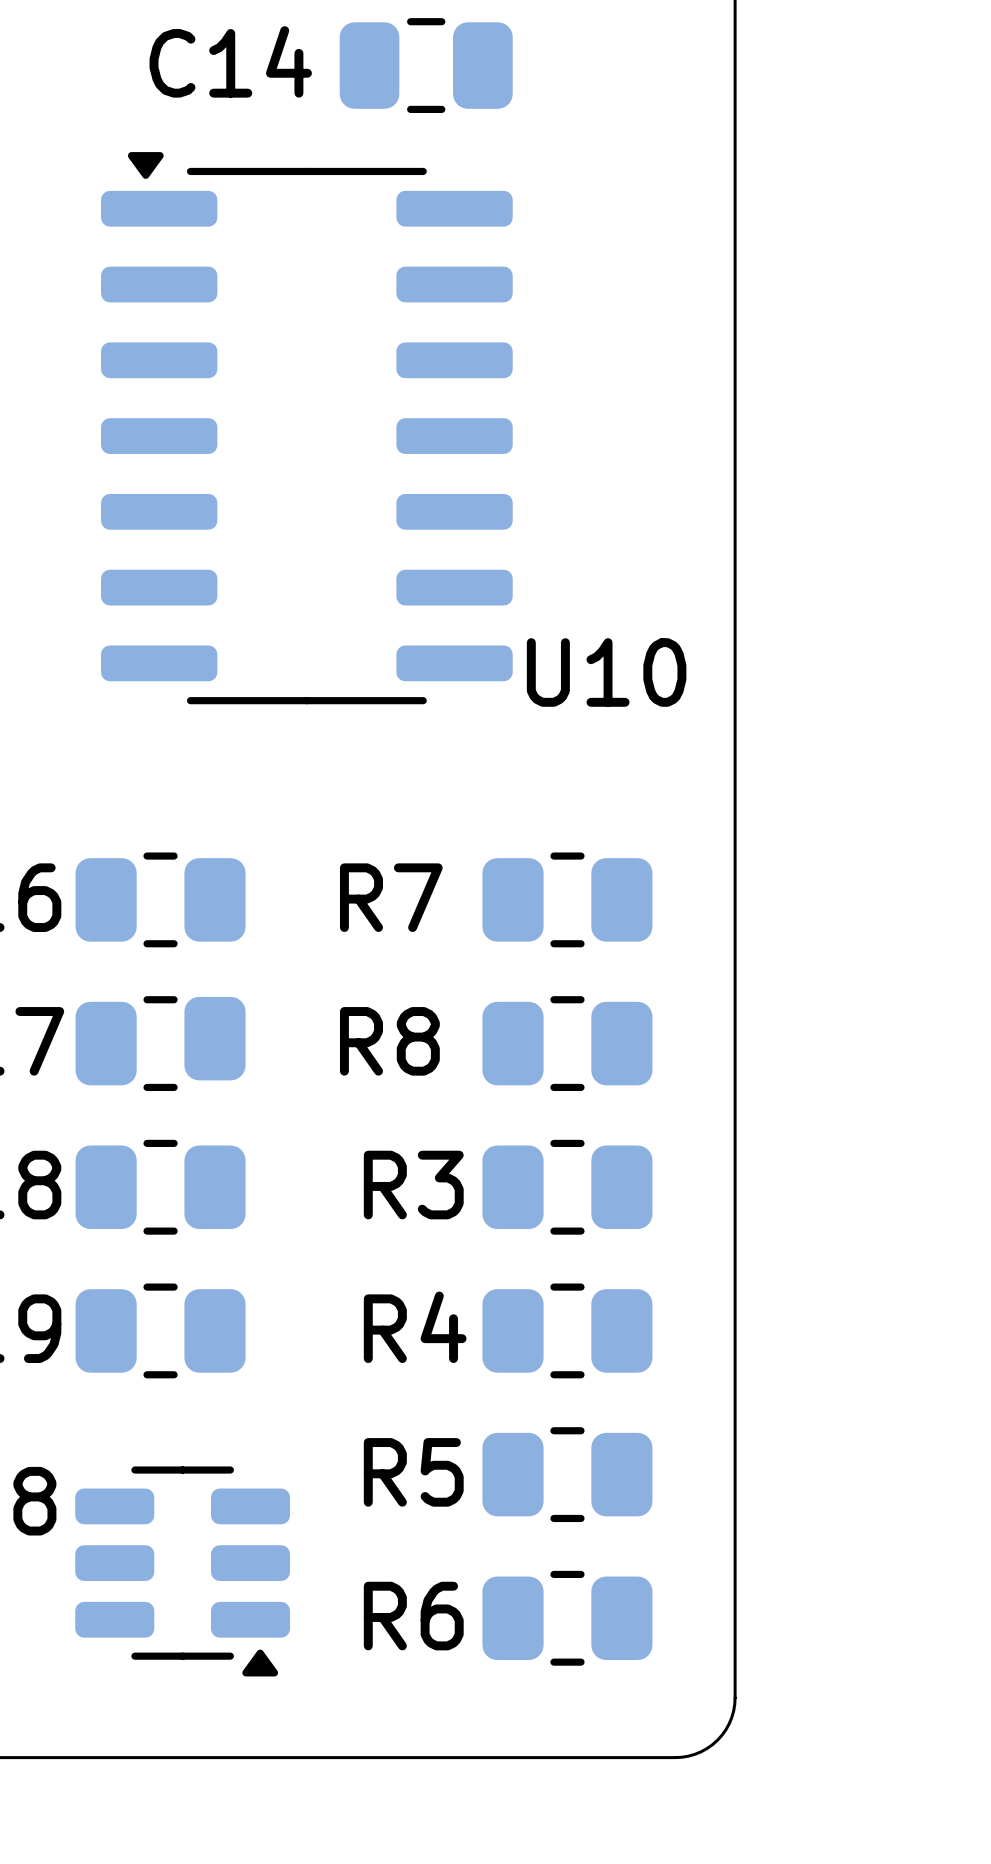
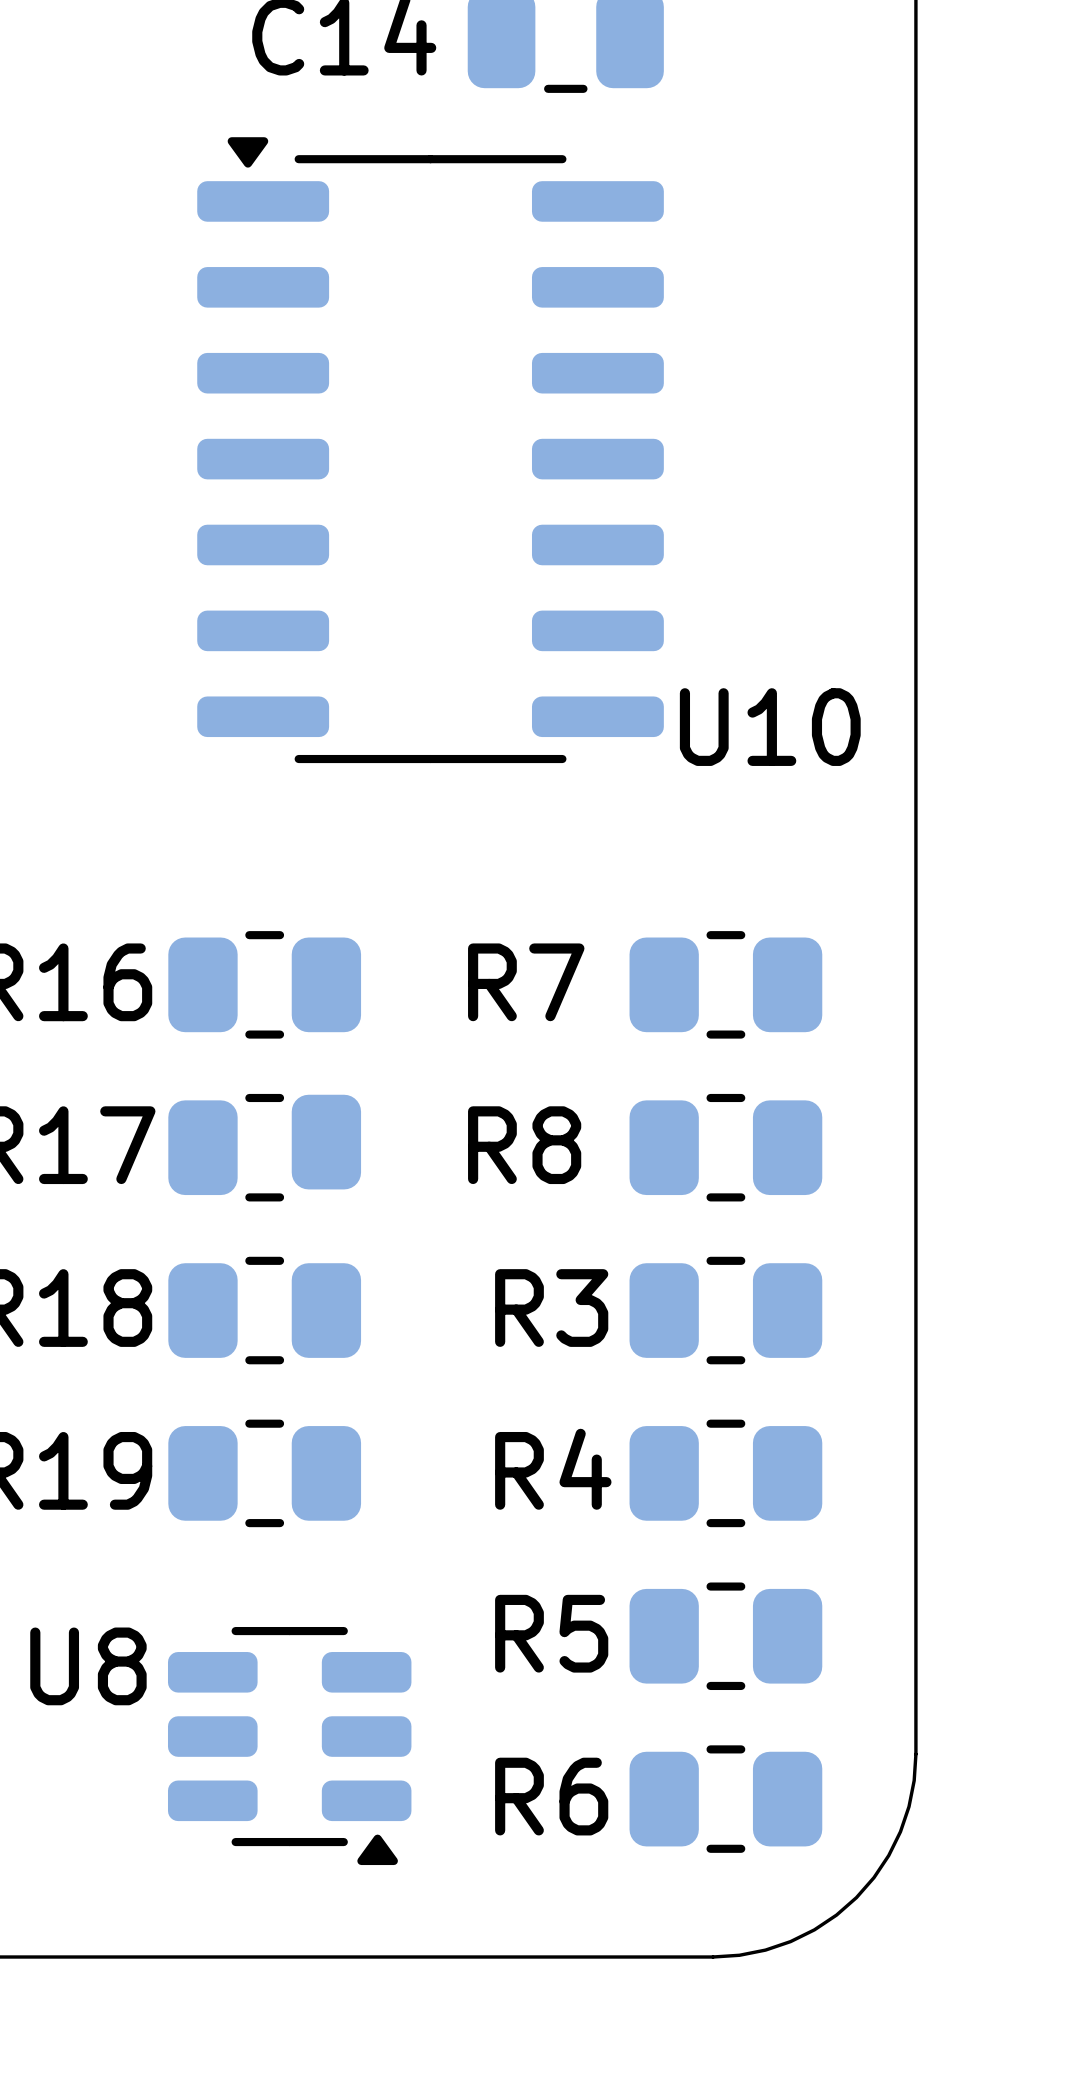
board edge: (735, 1578) (734, 1704) (729, 1723) (717, 1740) (701, 1751) (682, 1757) (556, 1757) -> (915, 1754) (914, 1780) (909, 1806) (900, 1831) (888, 1855) (874, 1877) (856, 1897) (836, 1915) (814, 1929) (790, 1941) (765, 1950) (739, 1955) (713, 1957)

